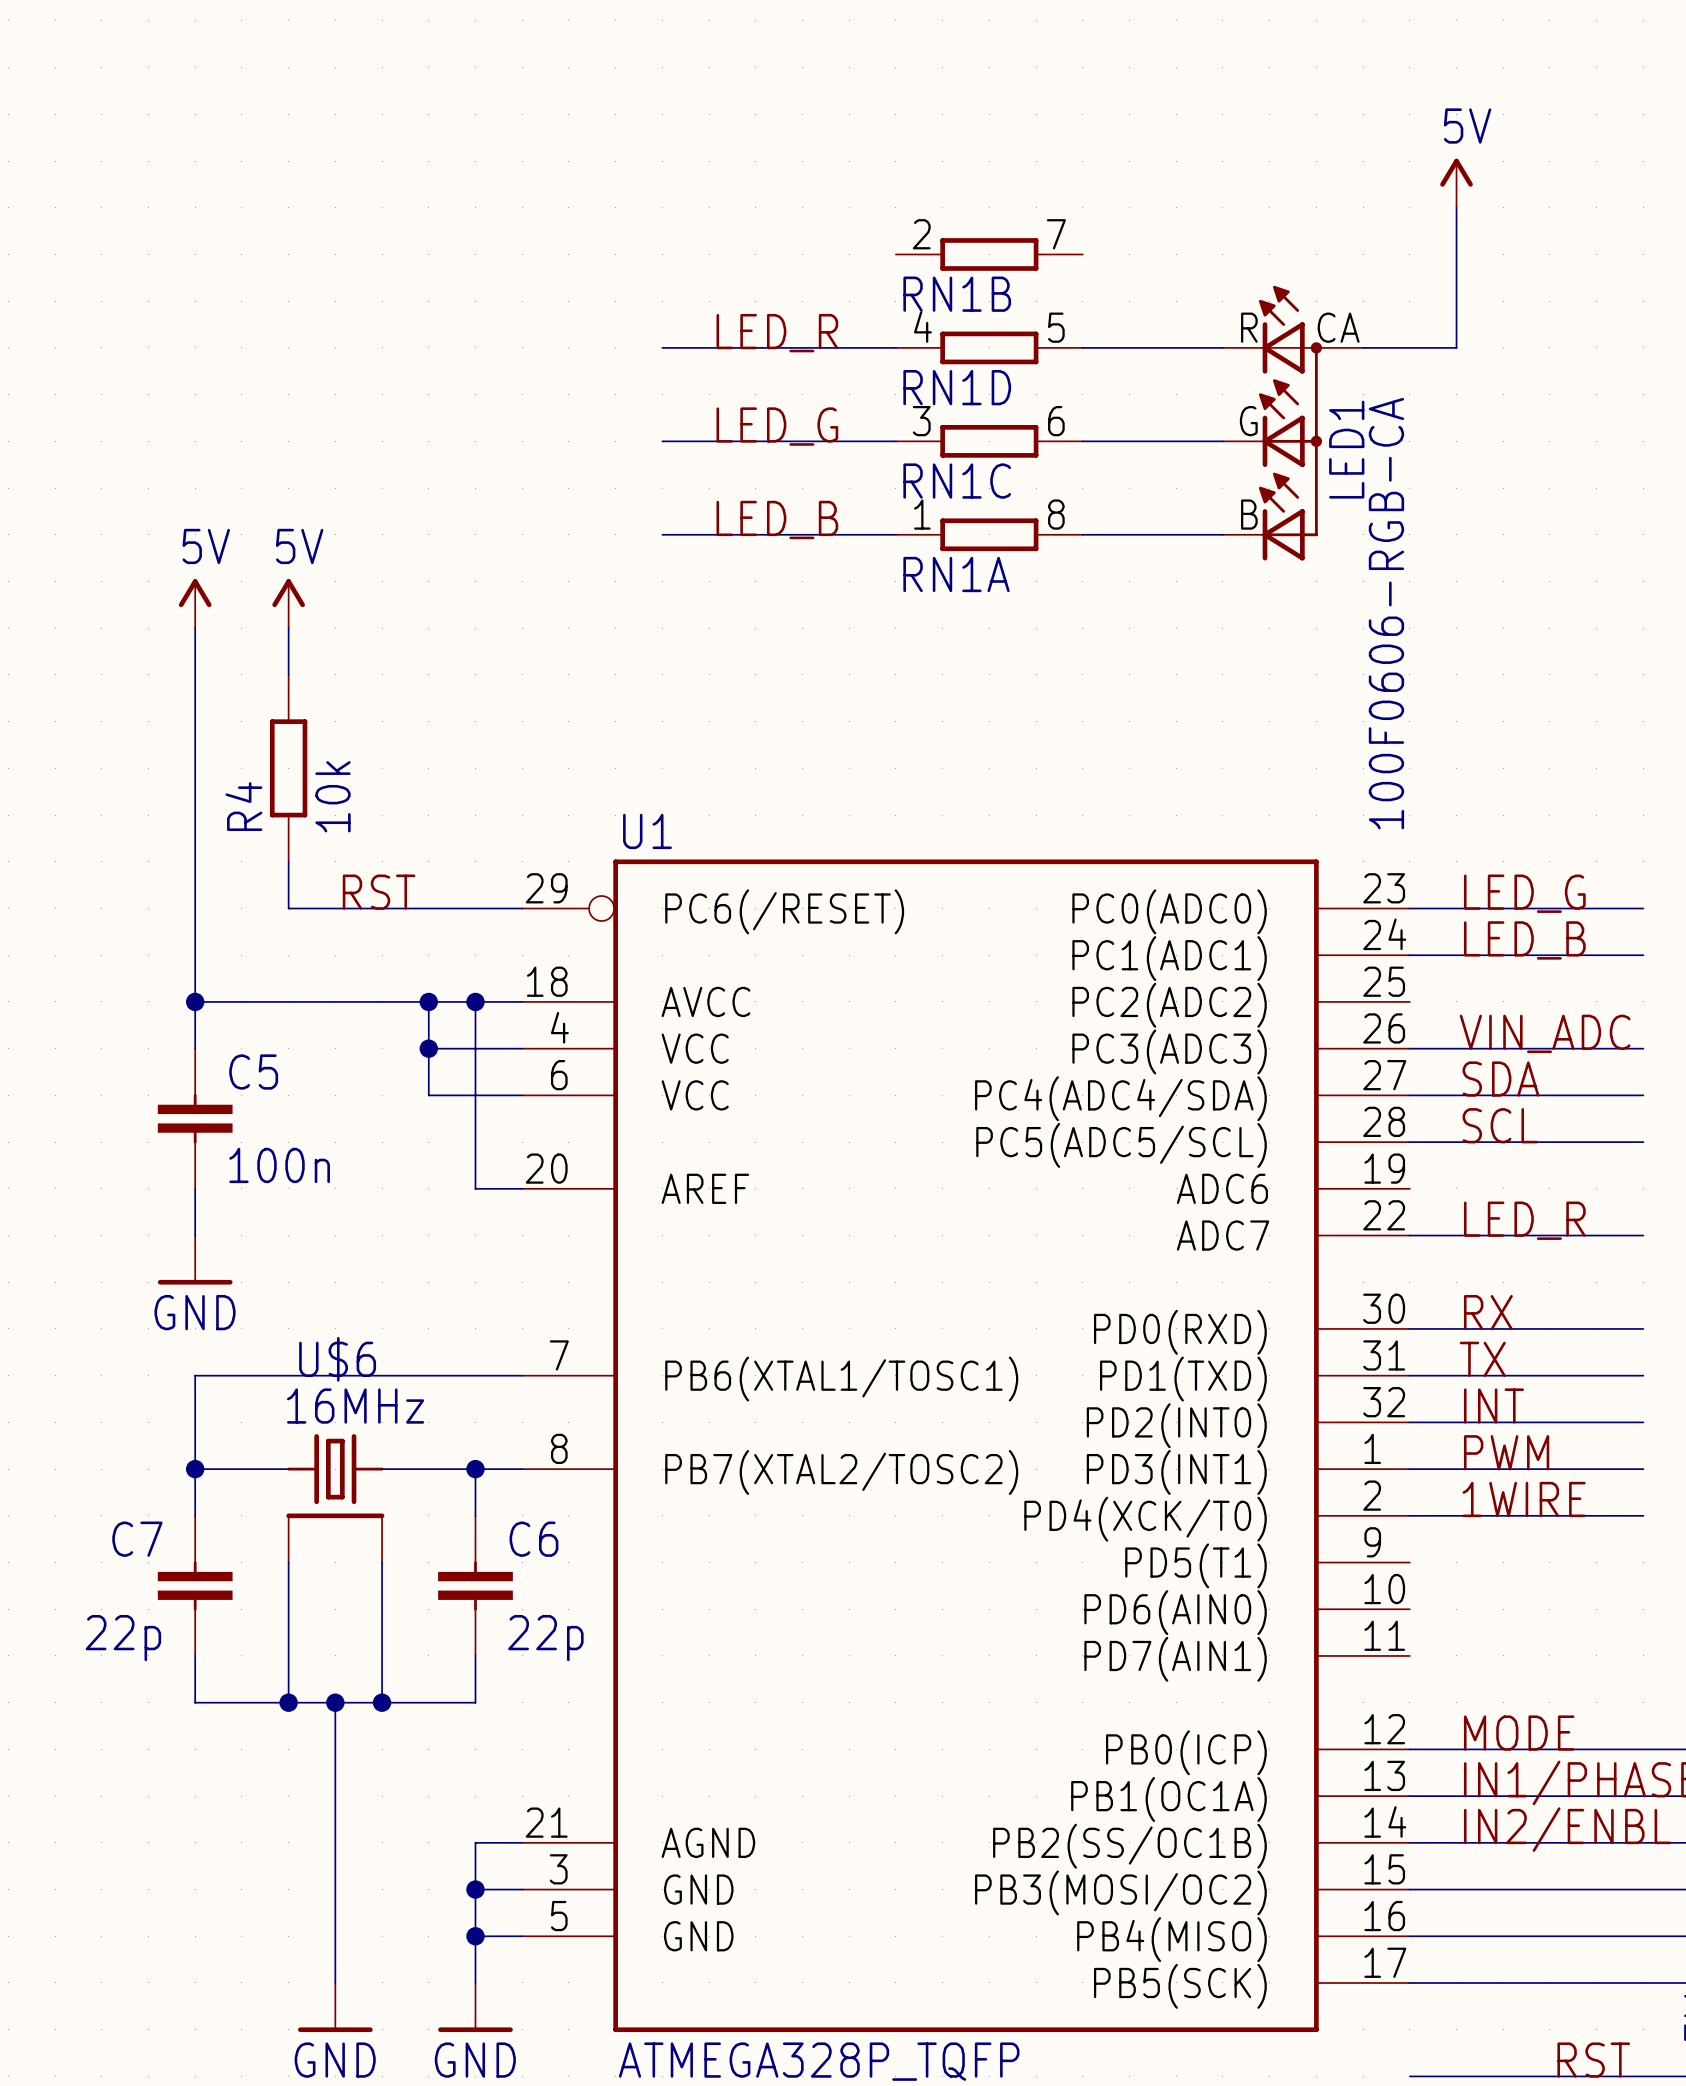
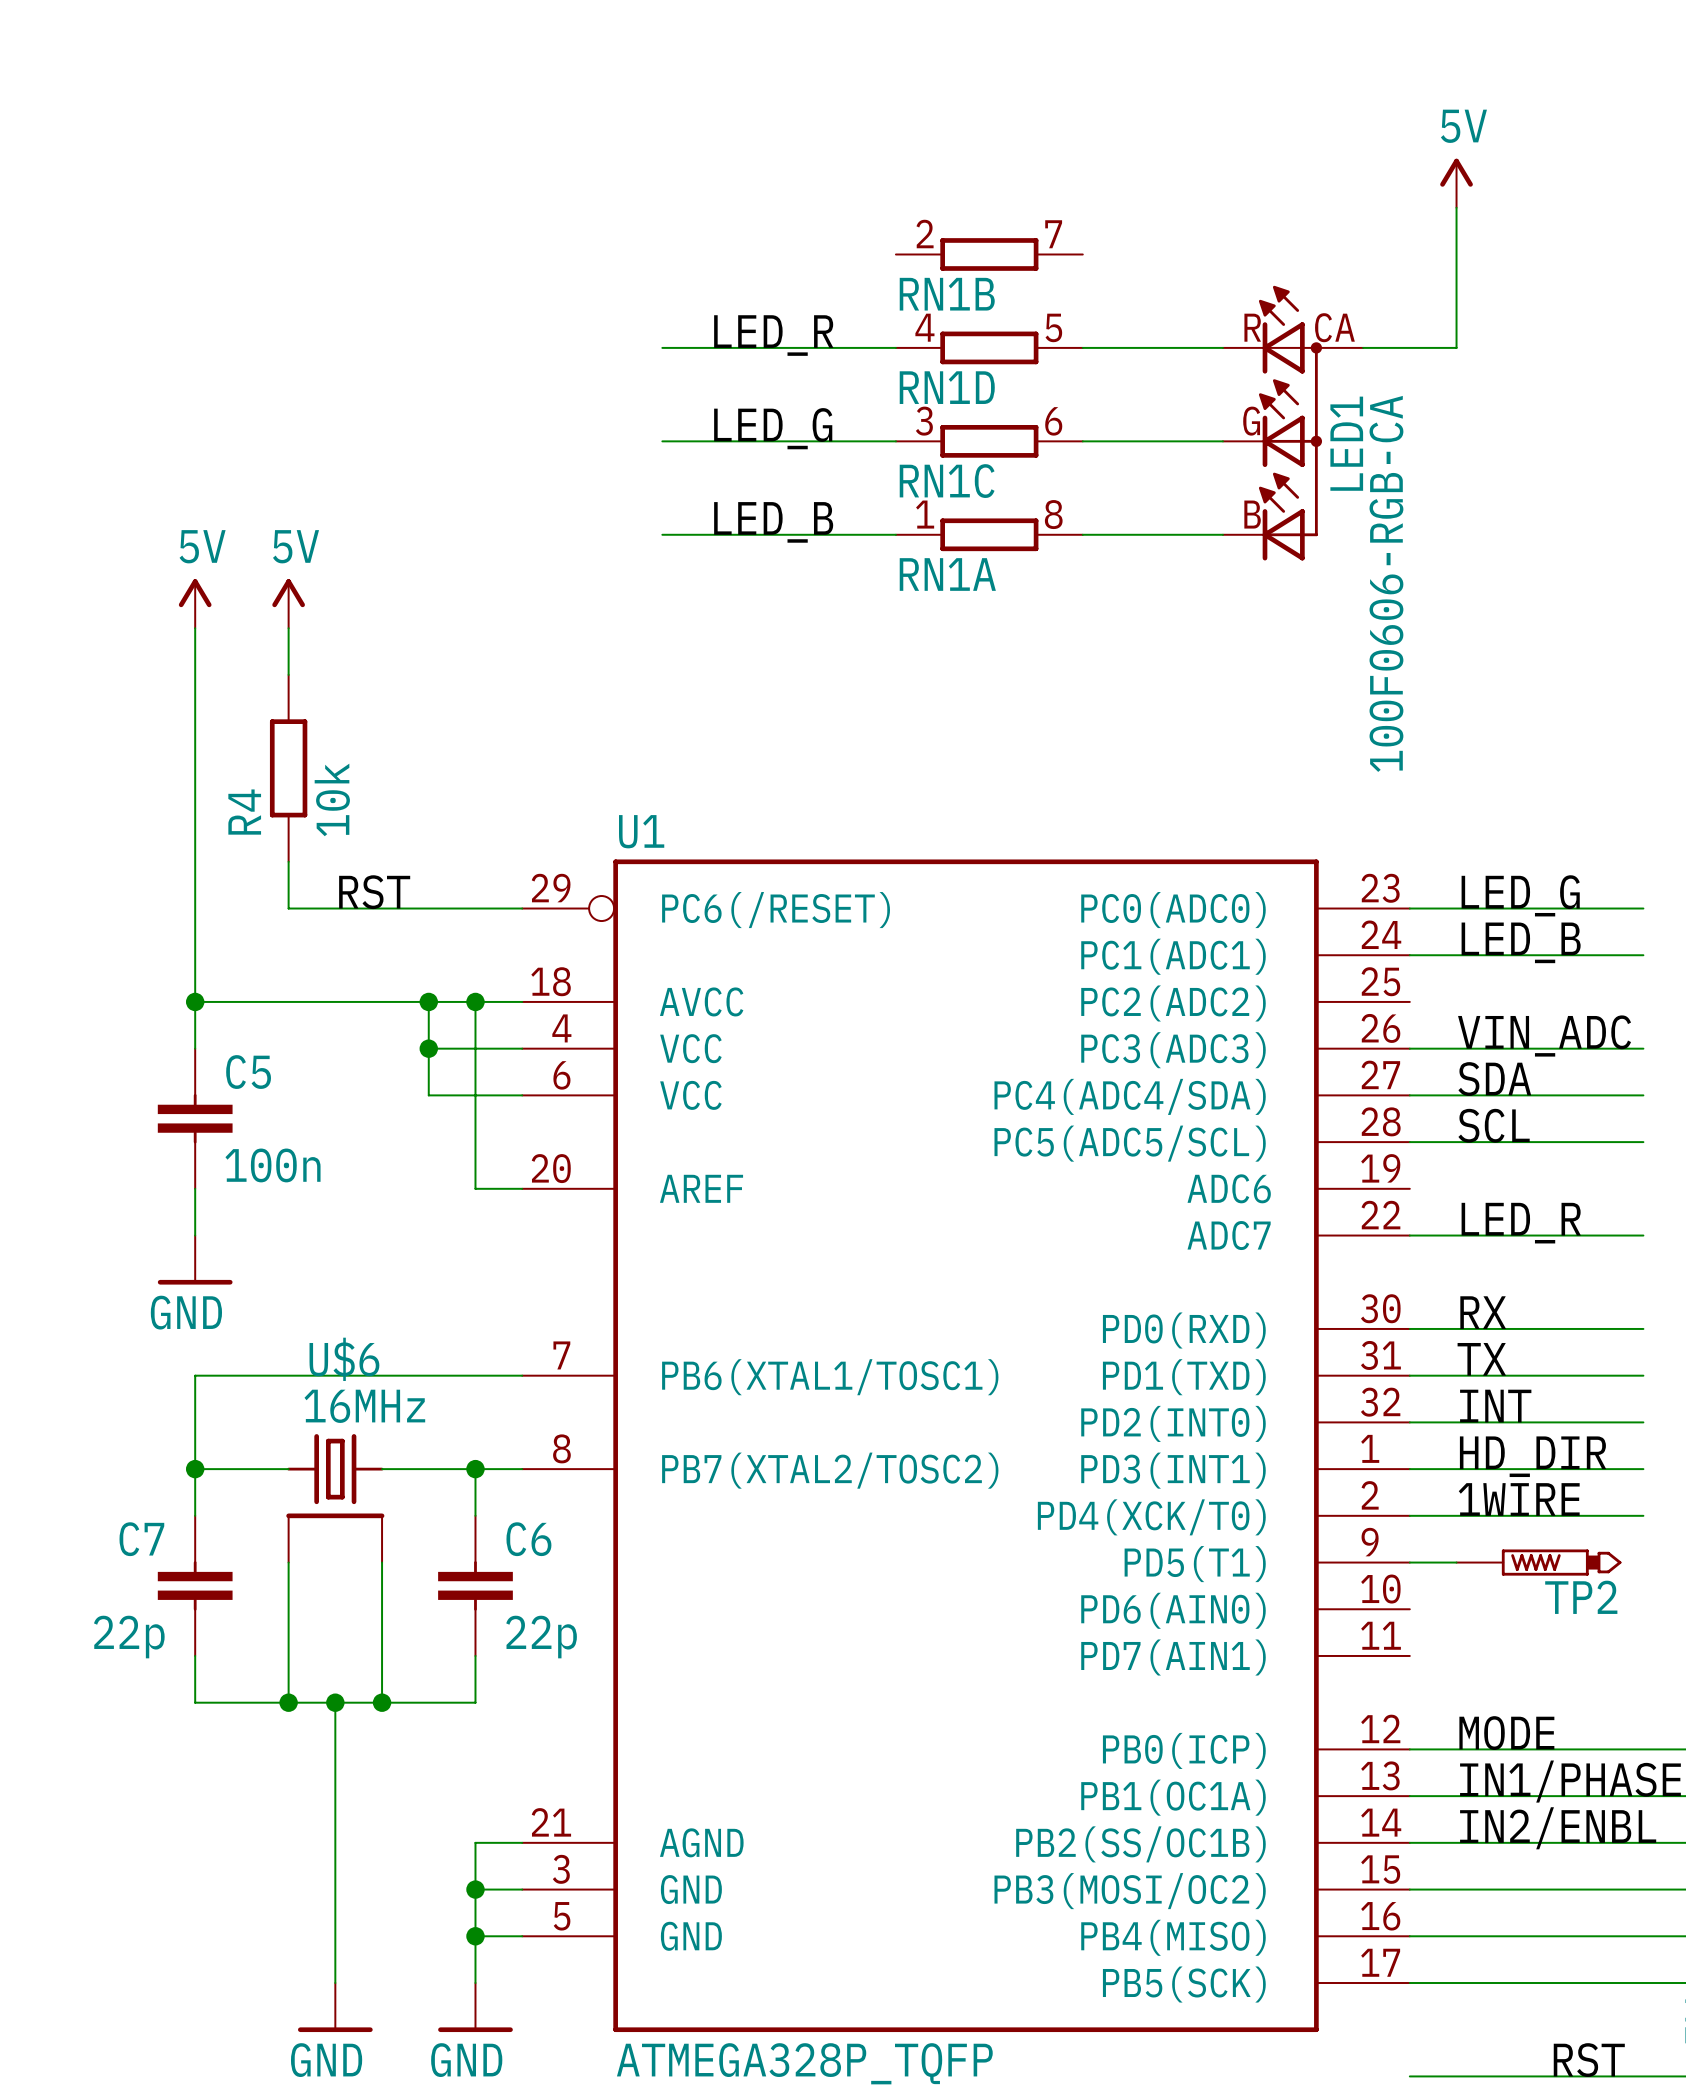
label: PWM (1506, 1452) -> HD_DIR (1533, 1456)
wire: none -> (1409, 1562) (1456, 1562)
TP2: none -> (1538, 1562)

